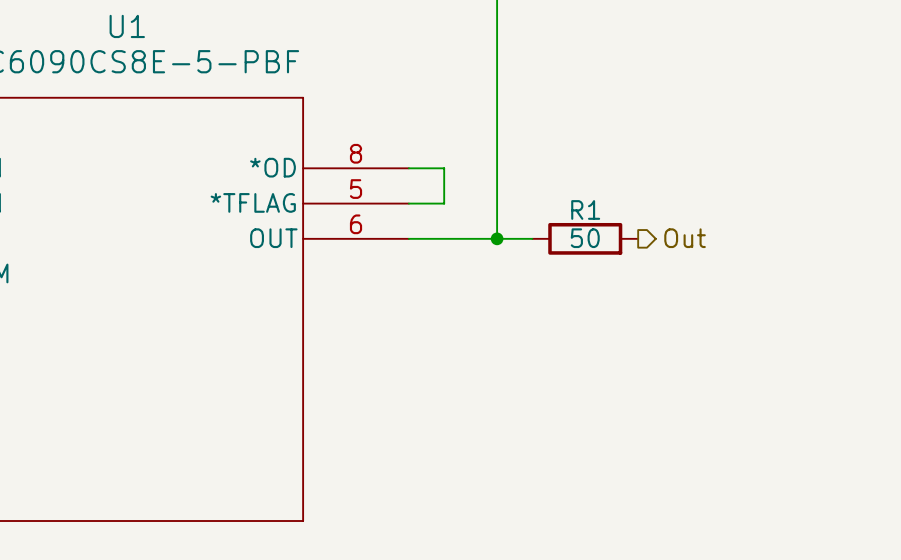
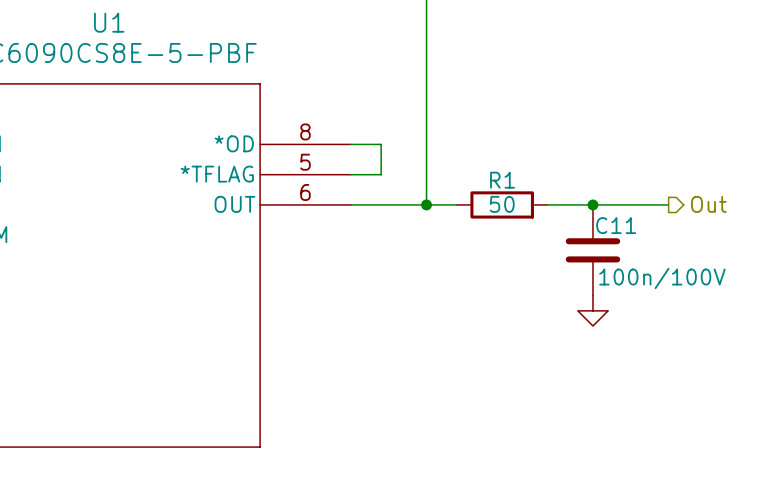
wire: none -> (547, 204) (668, 204)
hierarchical label position: Out (685, 238) -> Out (708, 204)
junction: none -> (592, 204)
C11: none -> 100n/100V (592, 250)
power symbol: none -> (592, 310)

